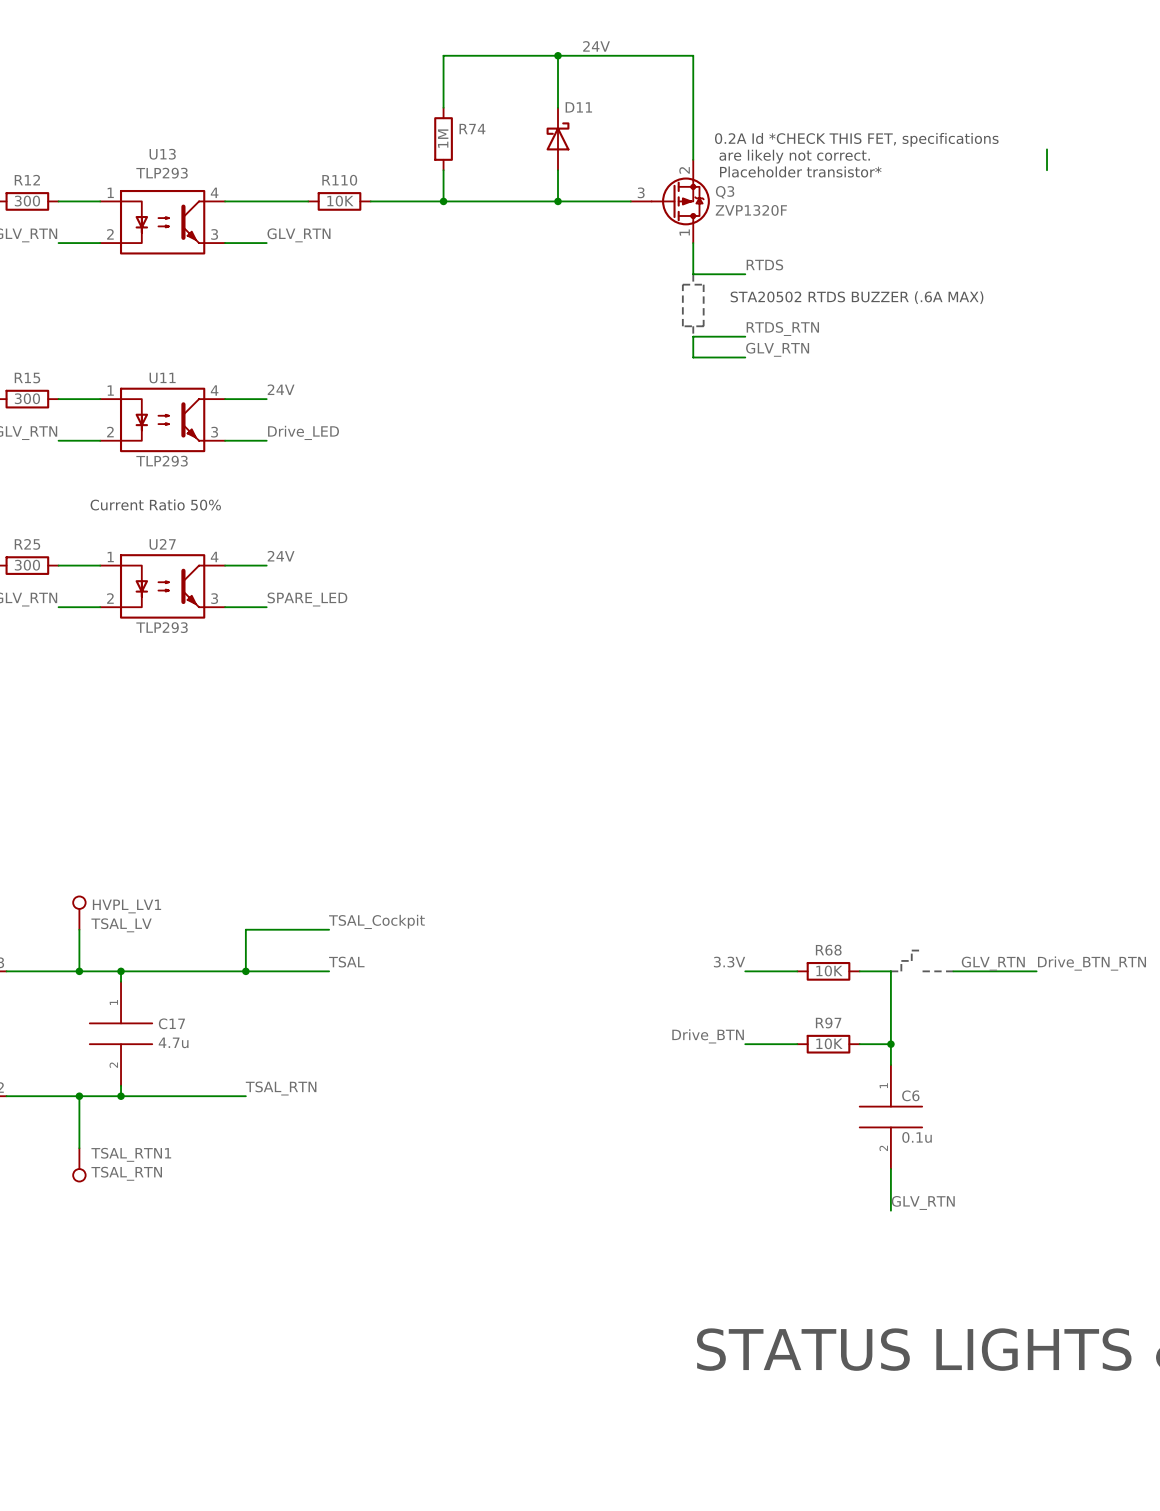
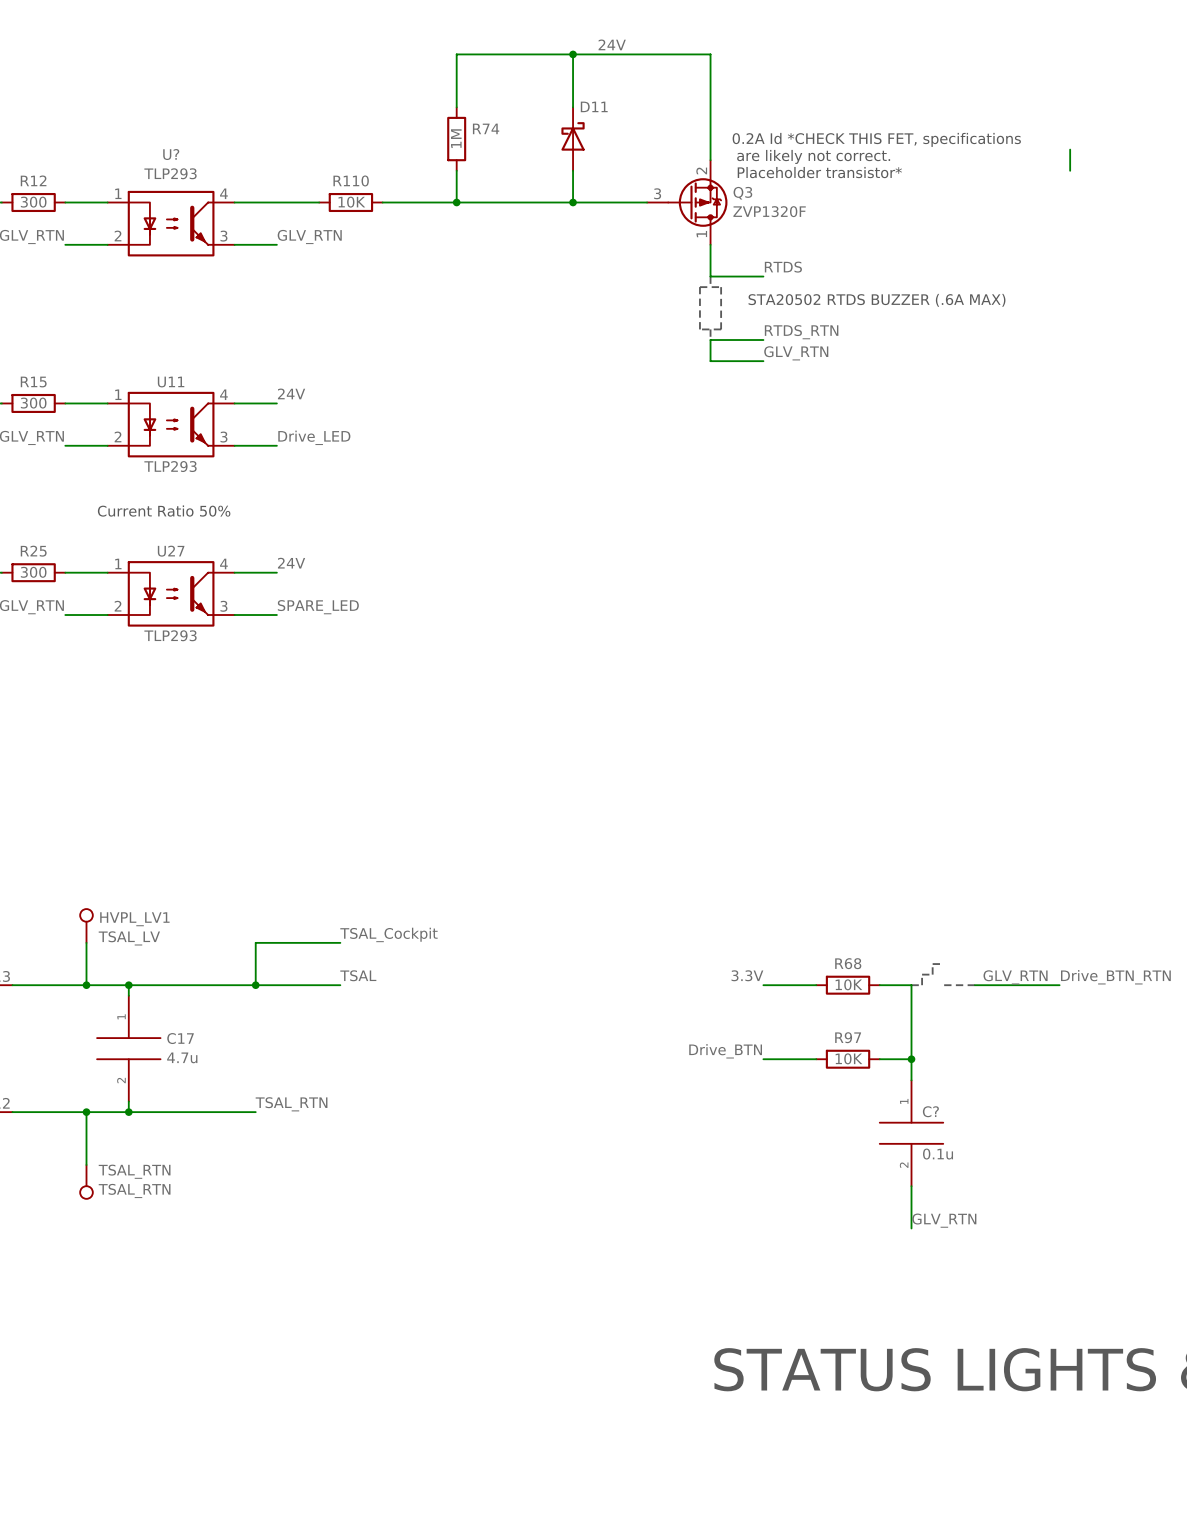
U13 name: U13 (162, 154) -> U? (171, 154)
C6 name: C6 (910, 1095) -> C? (930, 1111)
TSAL_RTN1 name: TSAL_RTN1 (131, 1154) -> TSAL_RTN (134, 1171)

